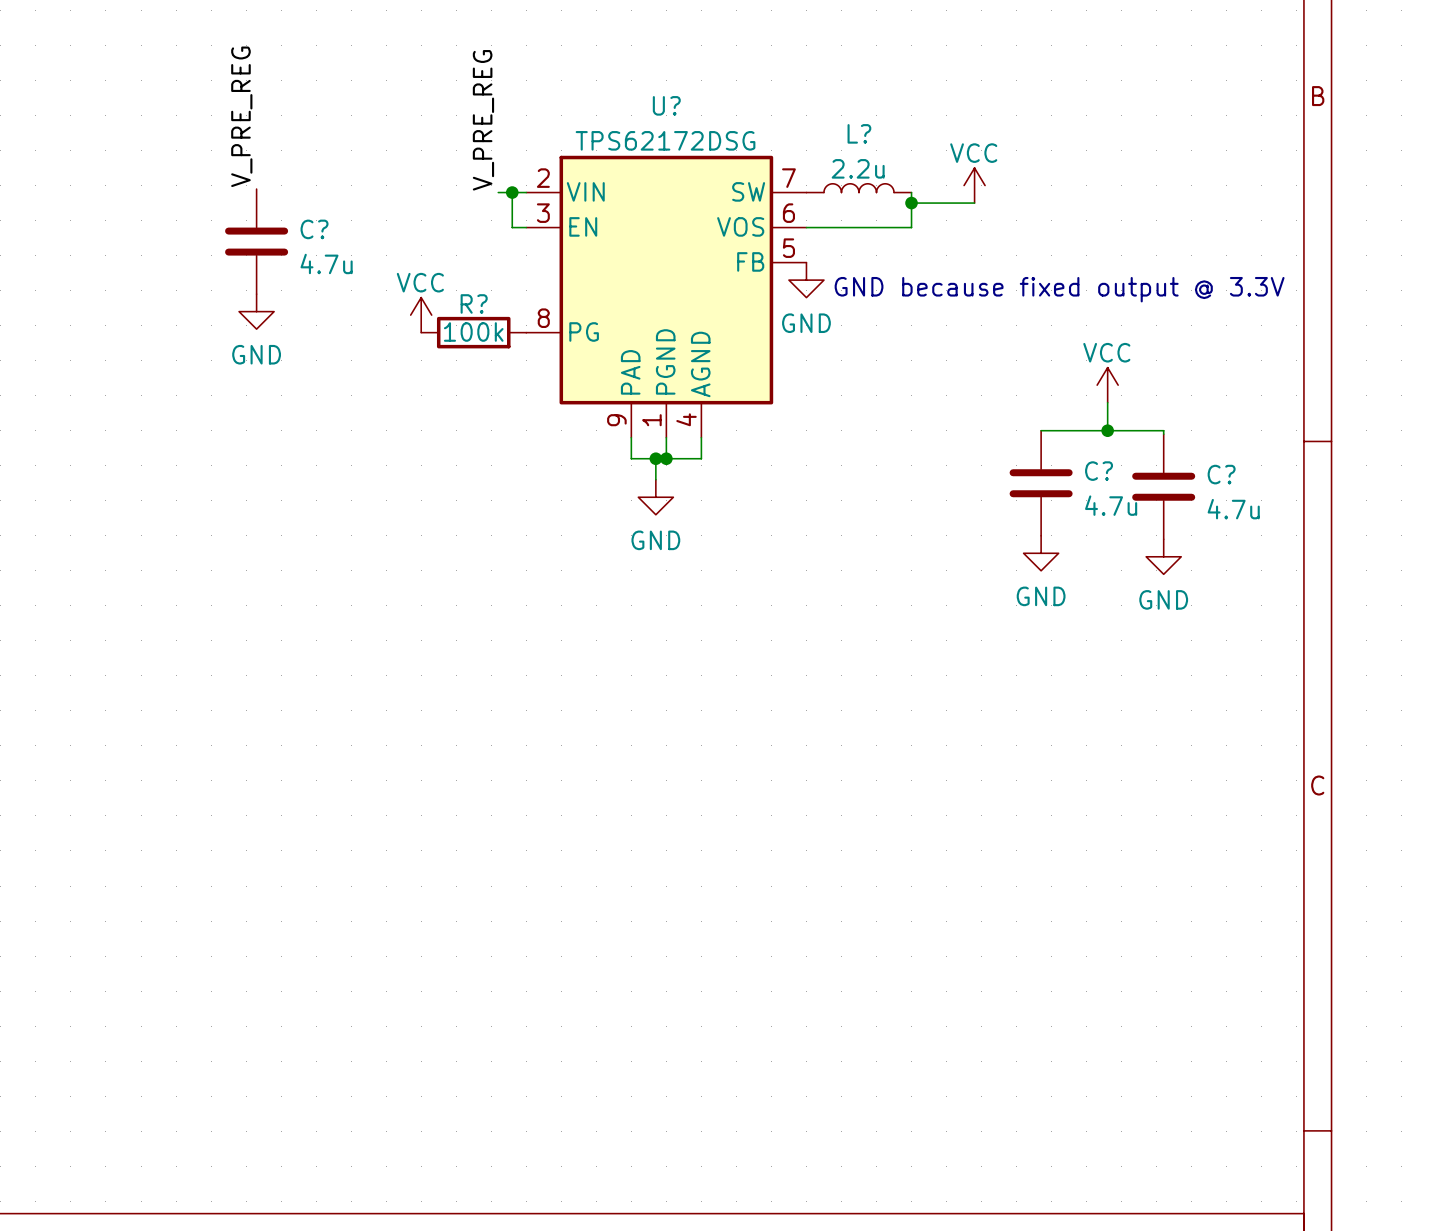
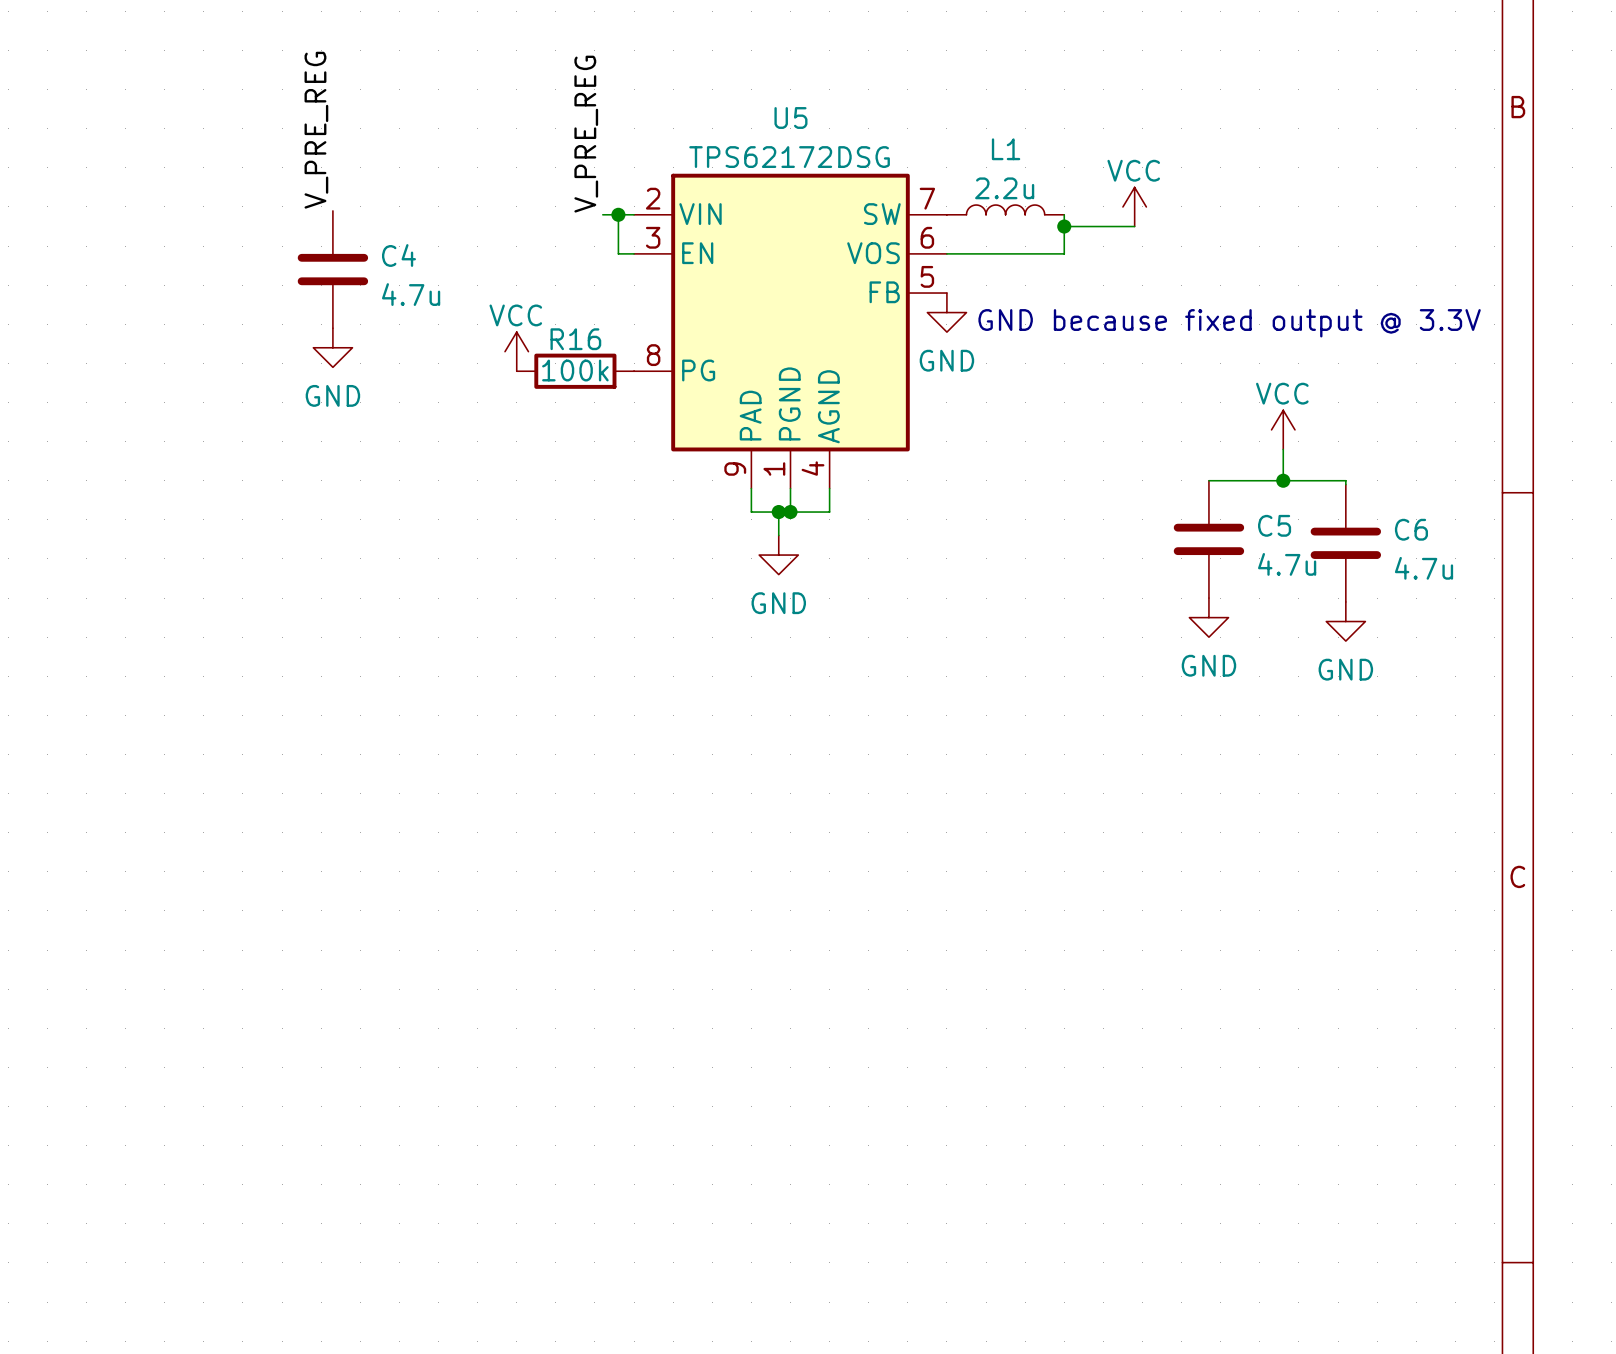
U? name: U? (666, 105) -> U5 (790, 117)
L? name: L? (859, 133) -> L1 (1006, 149)
C? name: C? (314, 229) -> C4 (398, 255)
R? name: R? (474, 303) -> R16 (575, 339)
C? name: C? (1099, 471) -> C5 (1274, 525)
C? name: C? (1221, 474) -> C6 (1411, 529)

